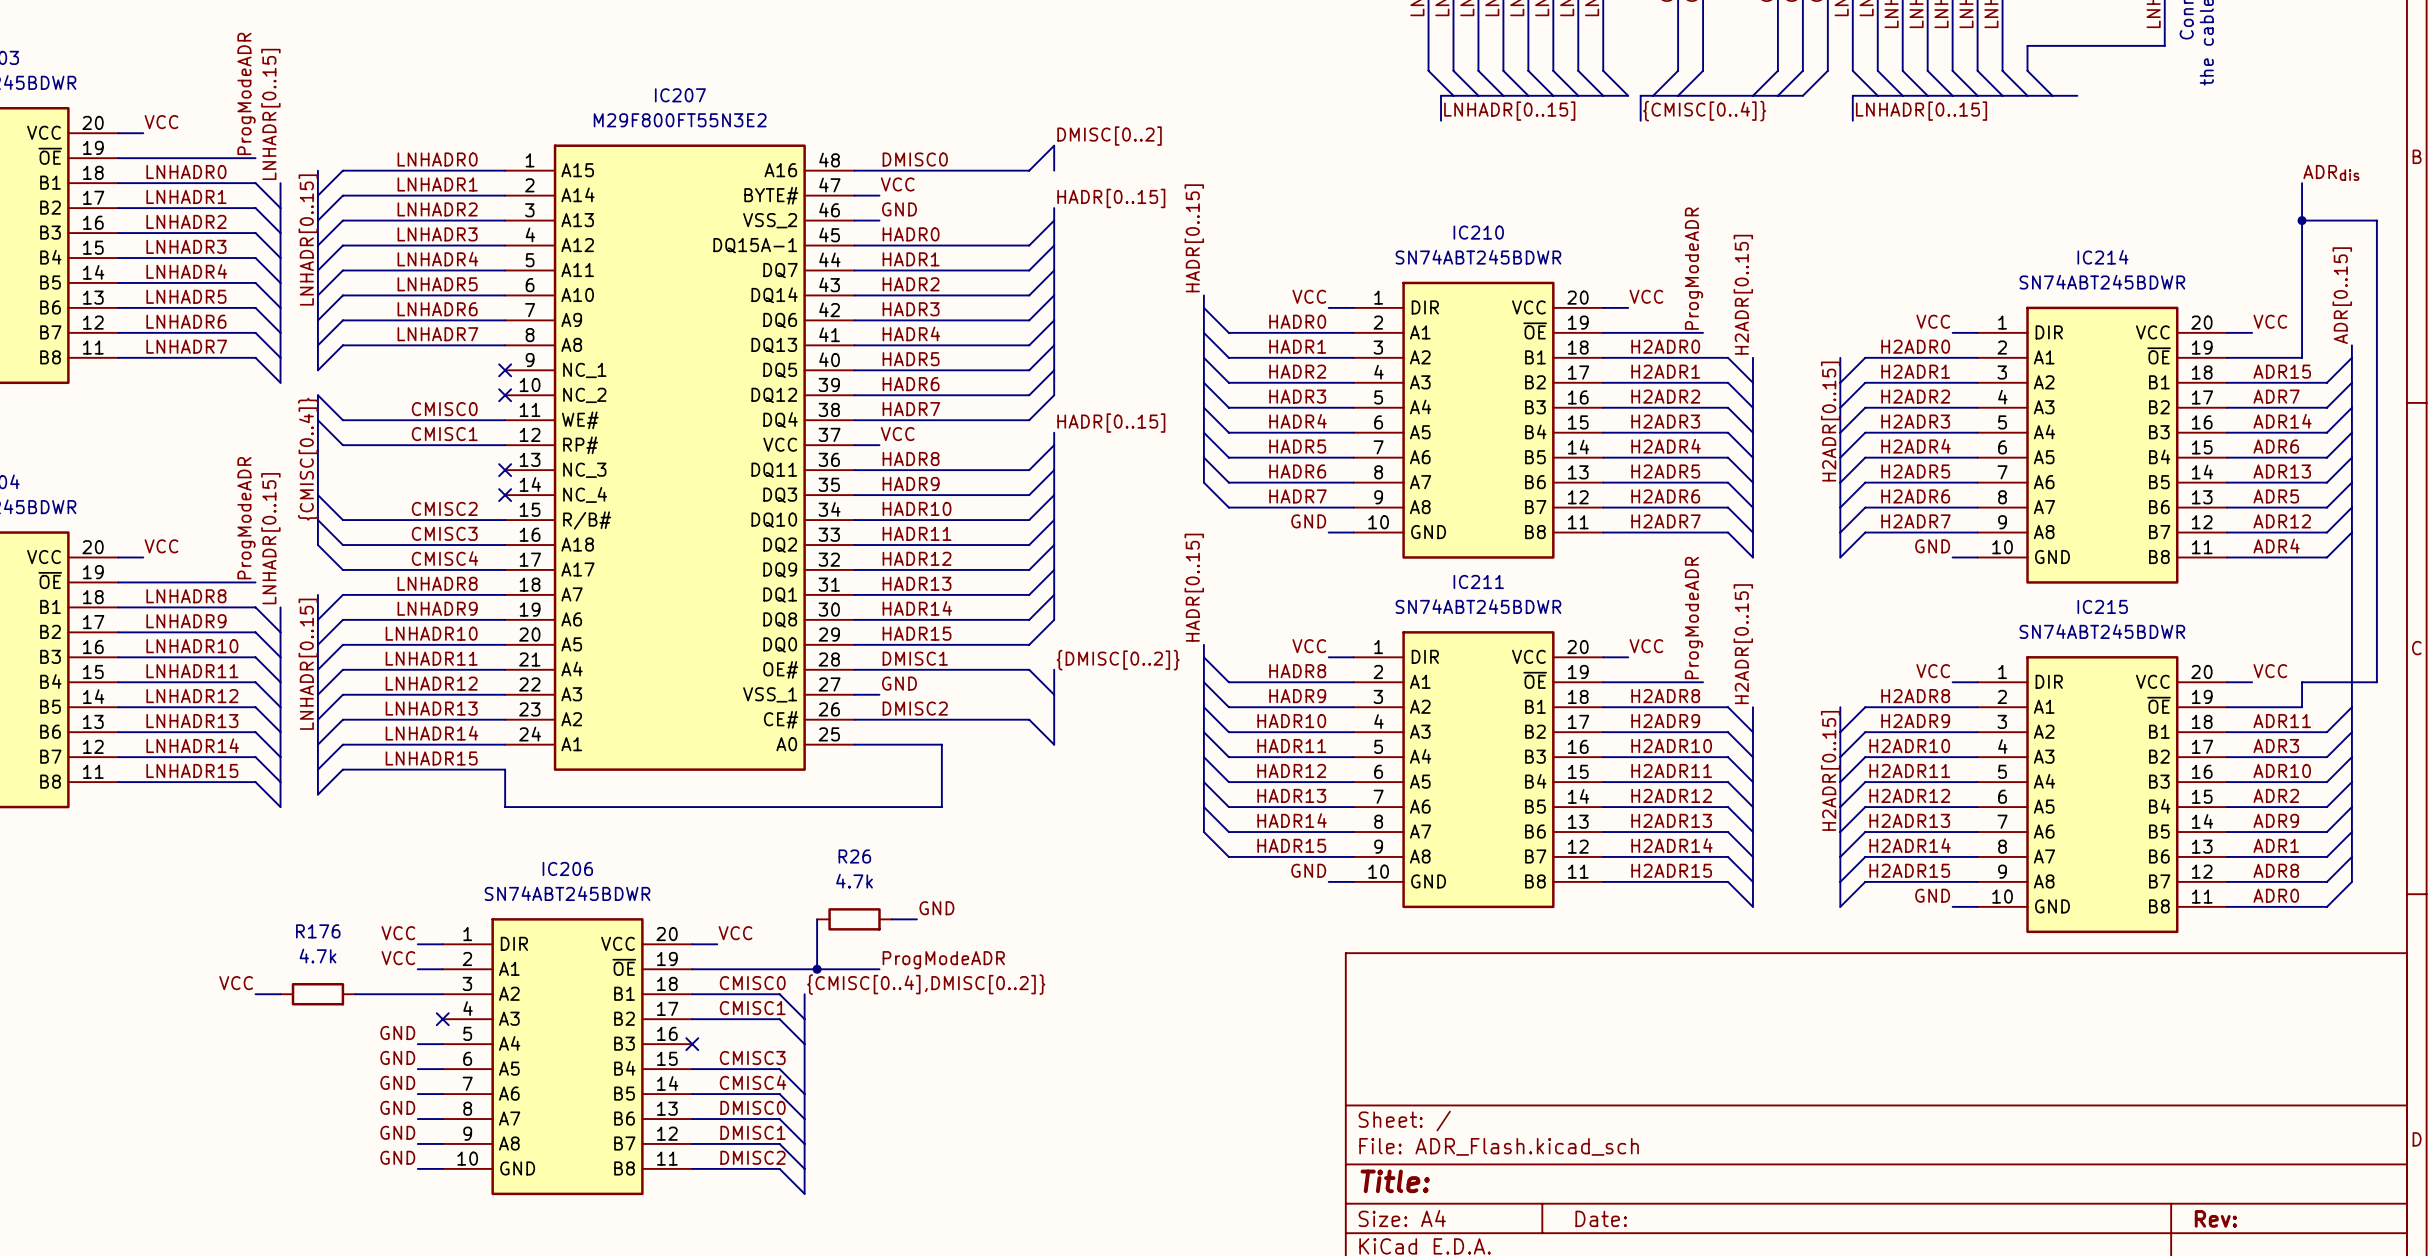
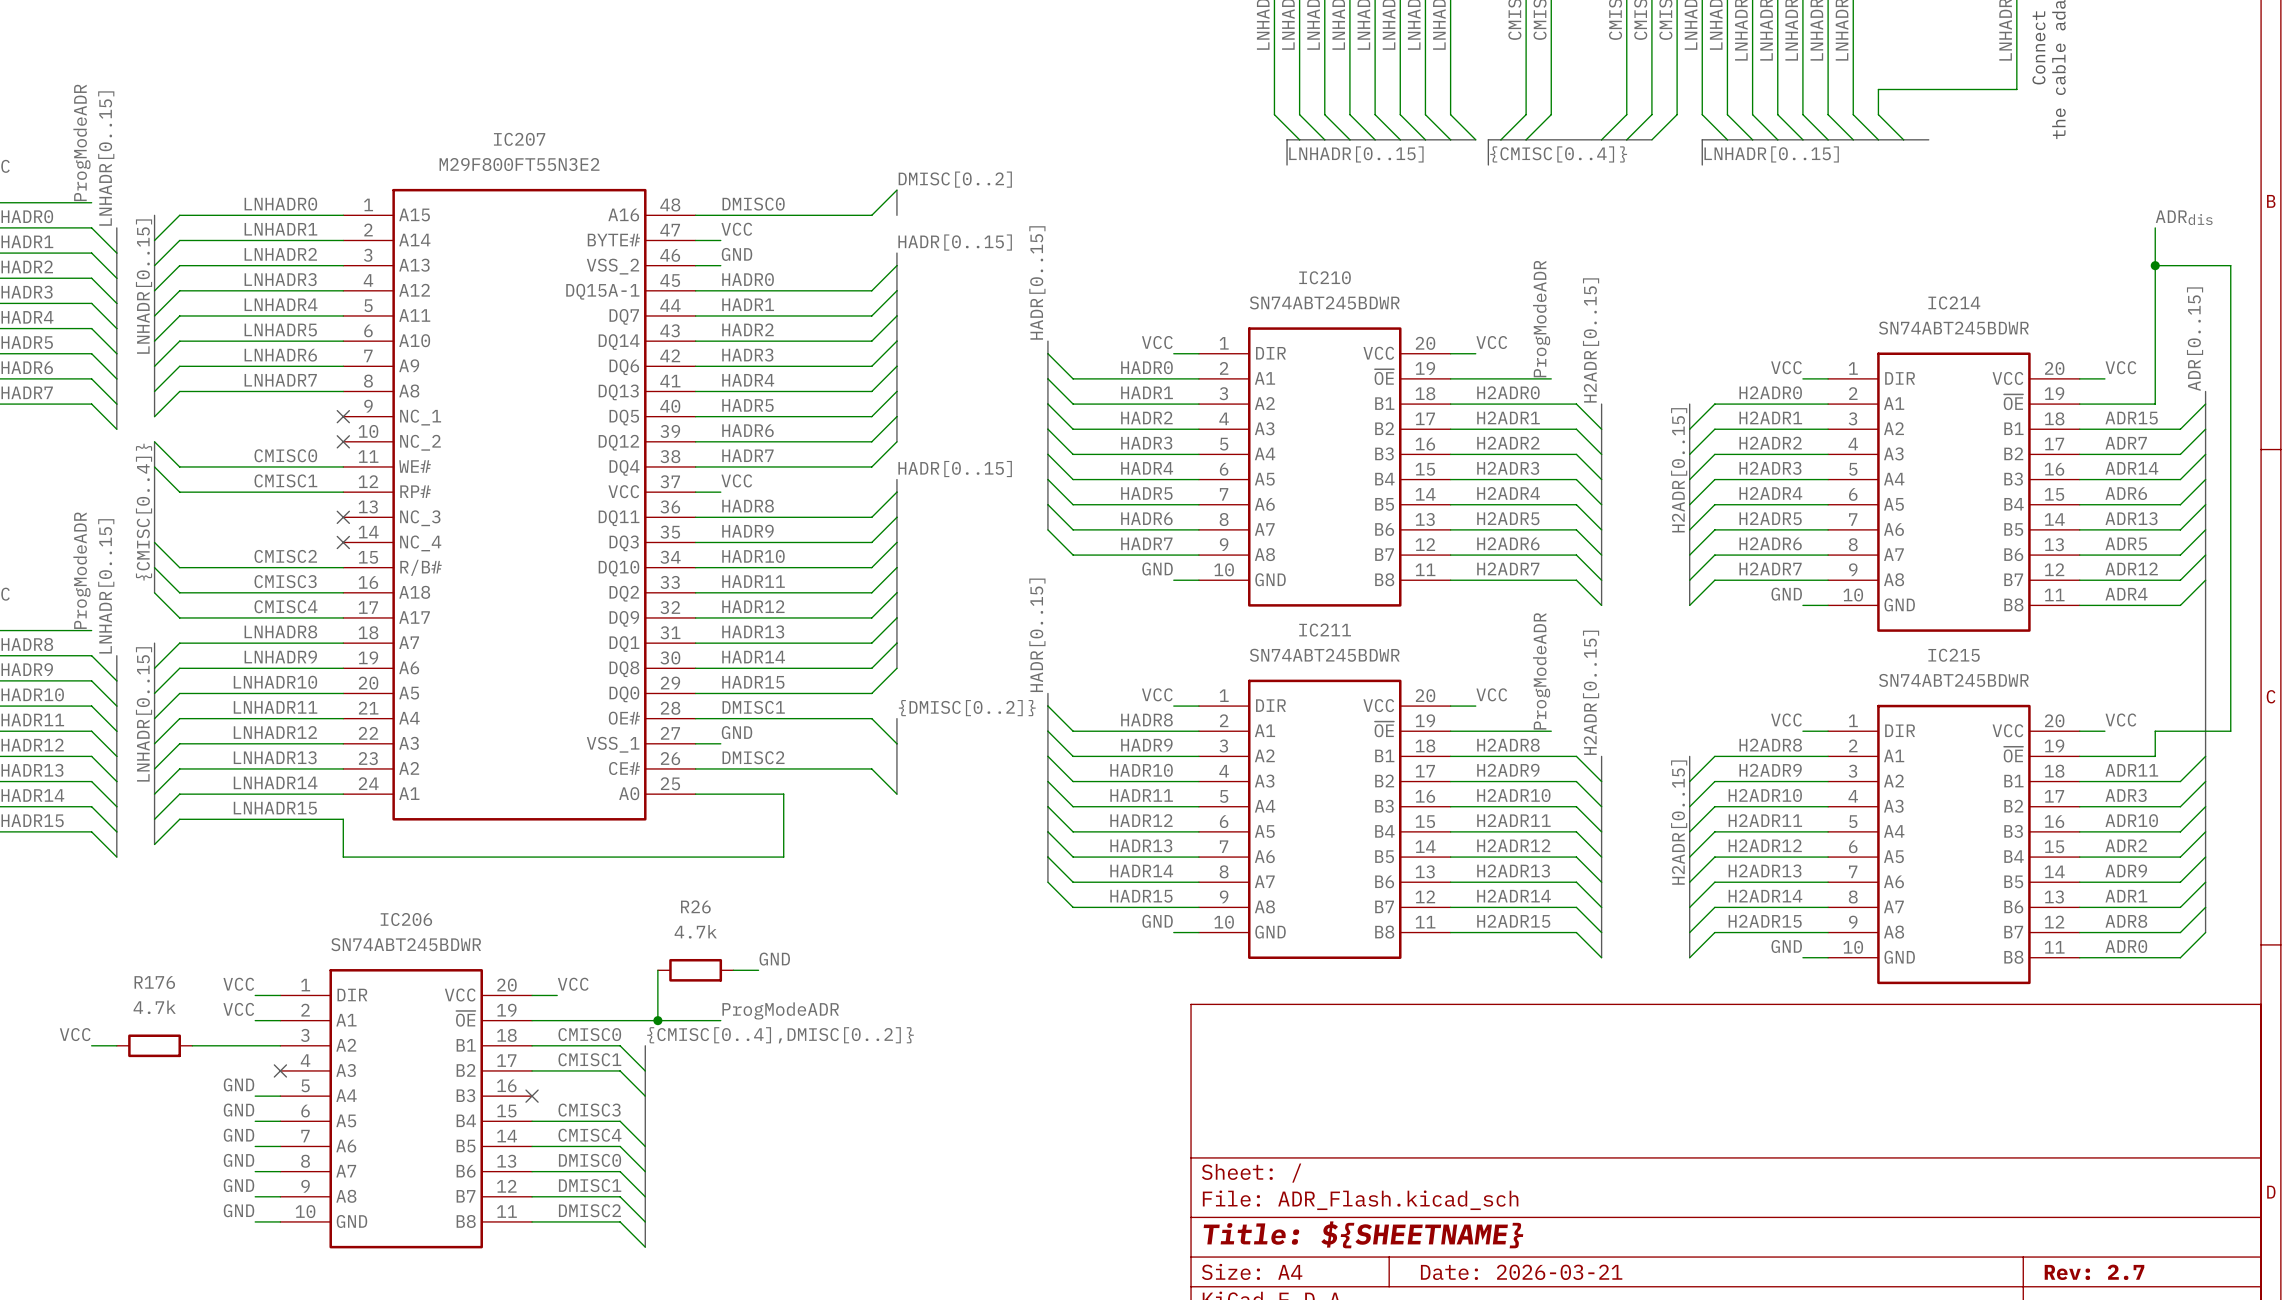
title block: Title: (1395, 1181) -> Title: ${SHEETNAME} (1363, 1234)
title block: Date: (1601, 1218) -> Date: 2026-03-21 (1521, 1272)
title block: Rev: (2215, 1218) -> Rev: 2.7 (2094, 1272)

